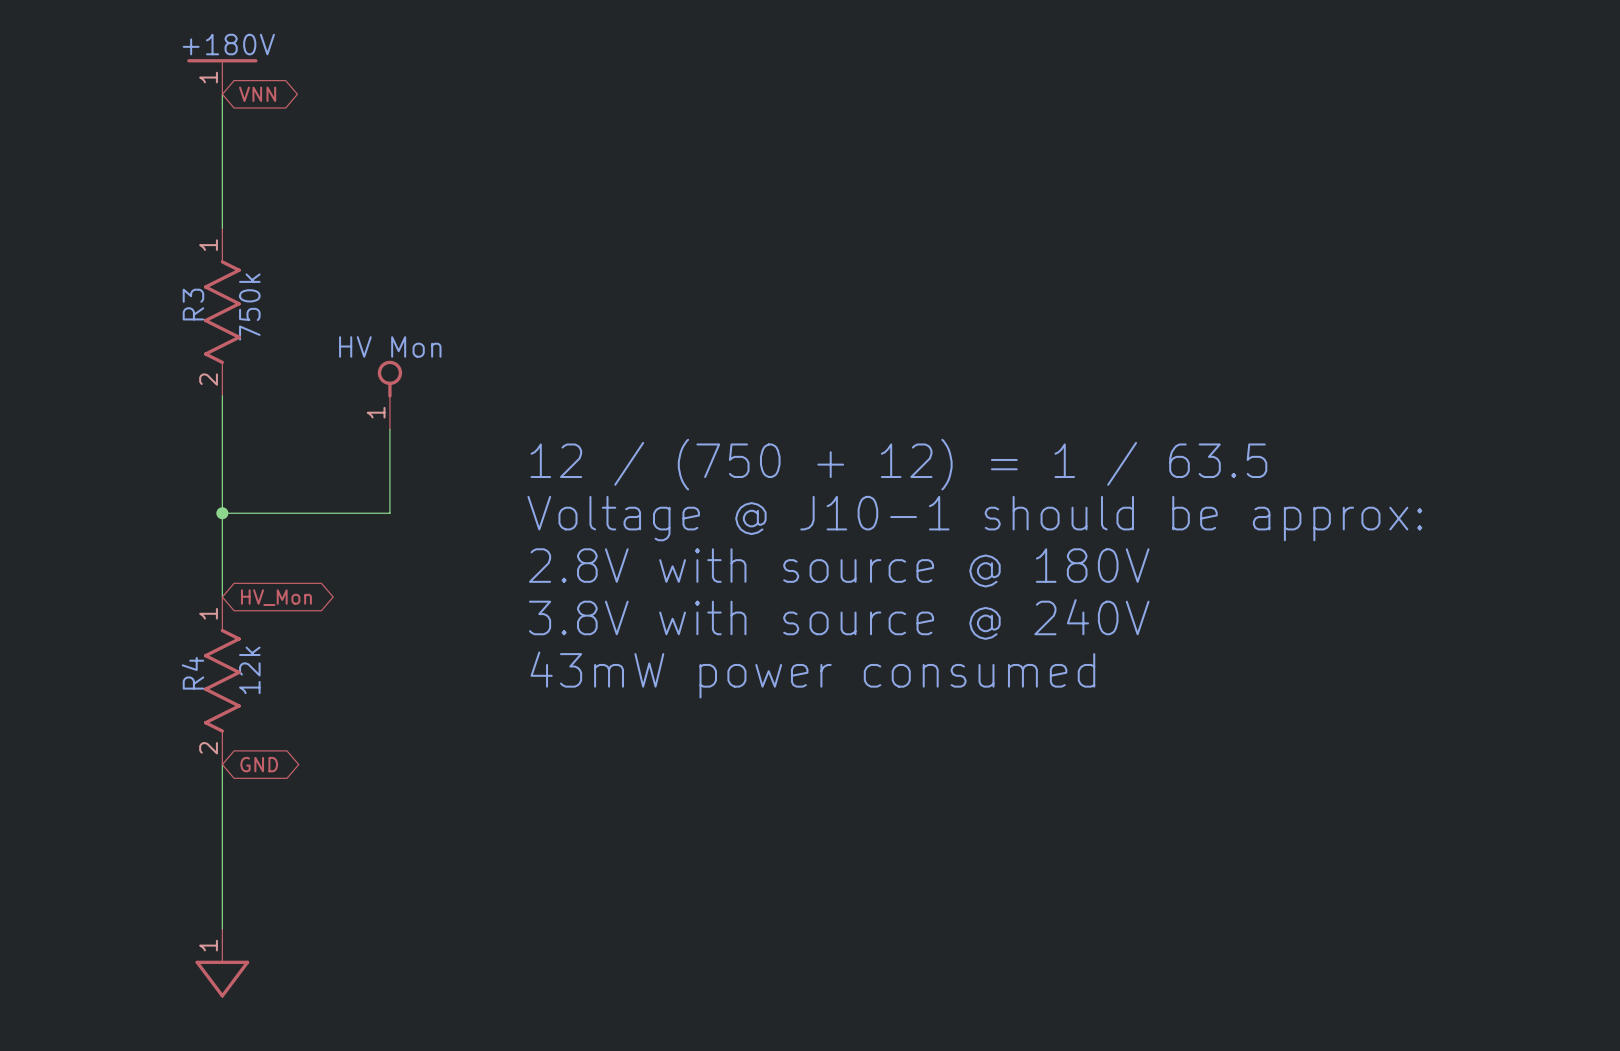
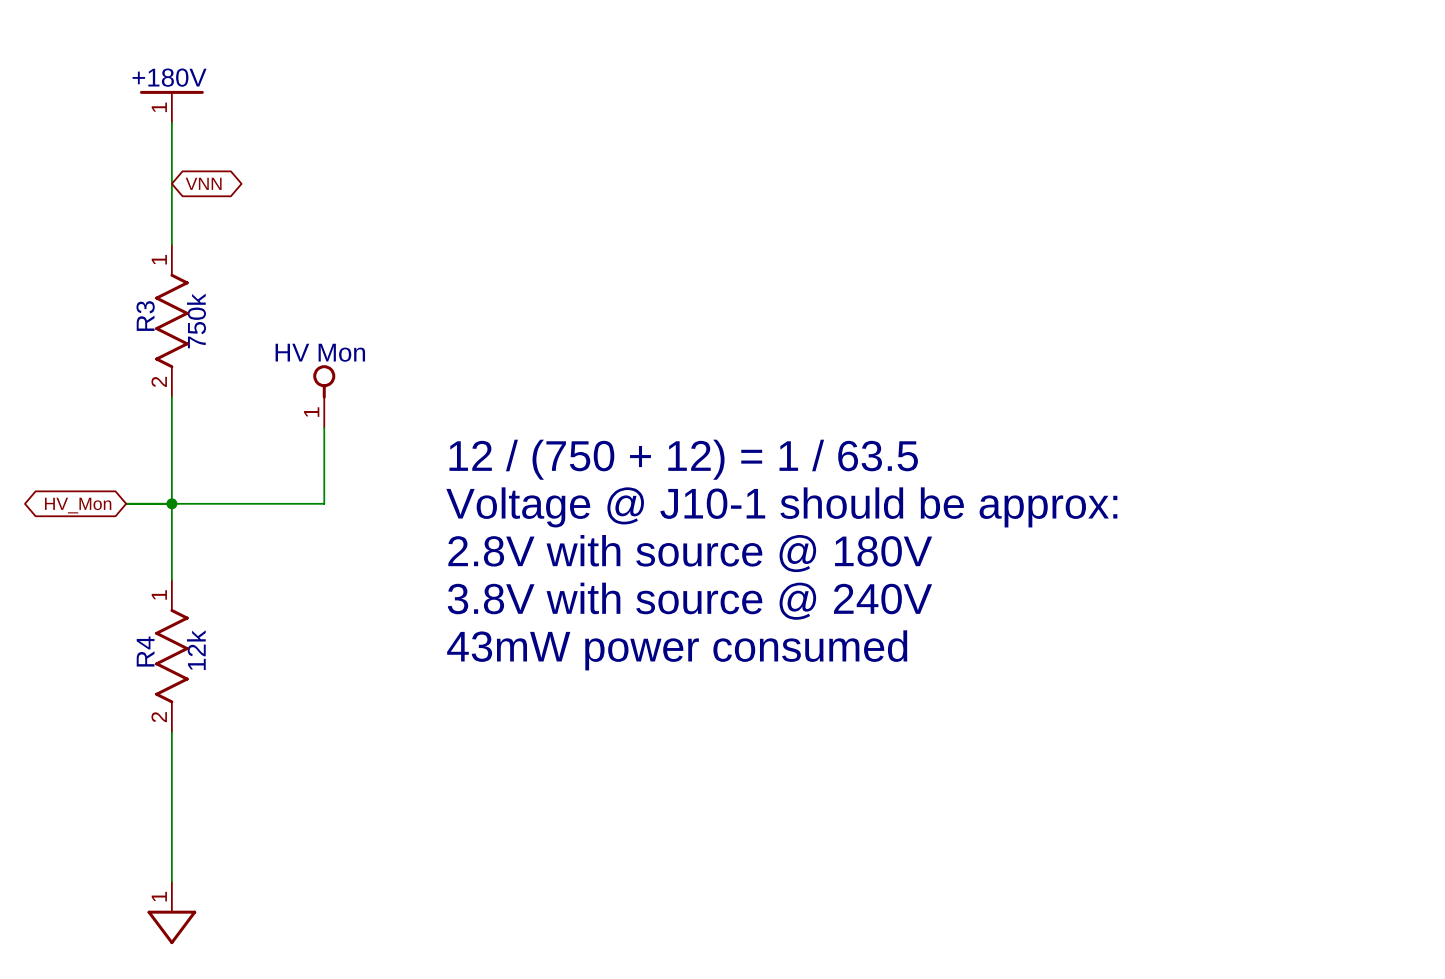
global label position: VNN (257, 94) -> VNN (203, 183)
wire: none -> (126, 503) (171, 503)
global label rotation: 0° (276, 597) -> 180° (78, 505)
global label position: HV_Mon (276, 597) -> HV_Mon (78, 505)
global label: GND (259, 764) -> none

